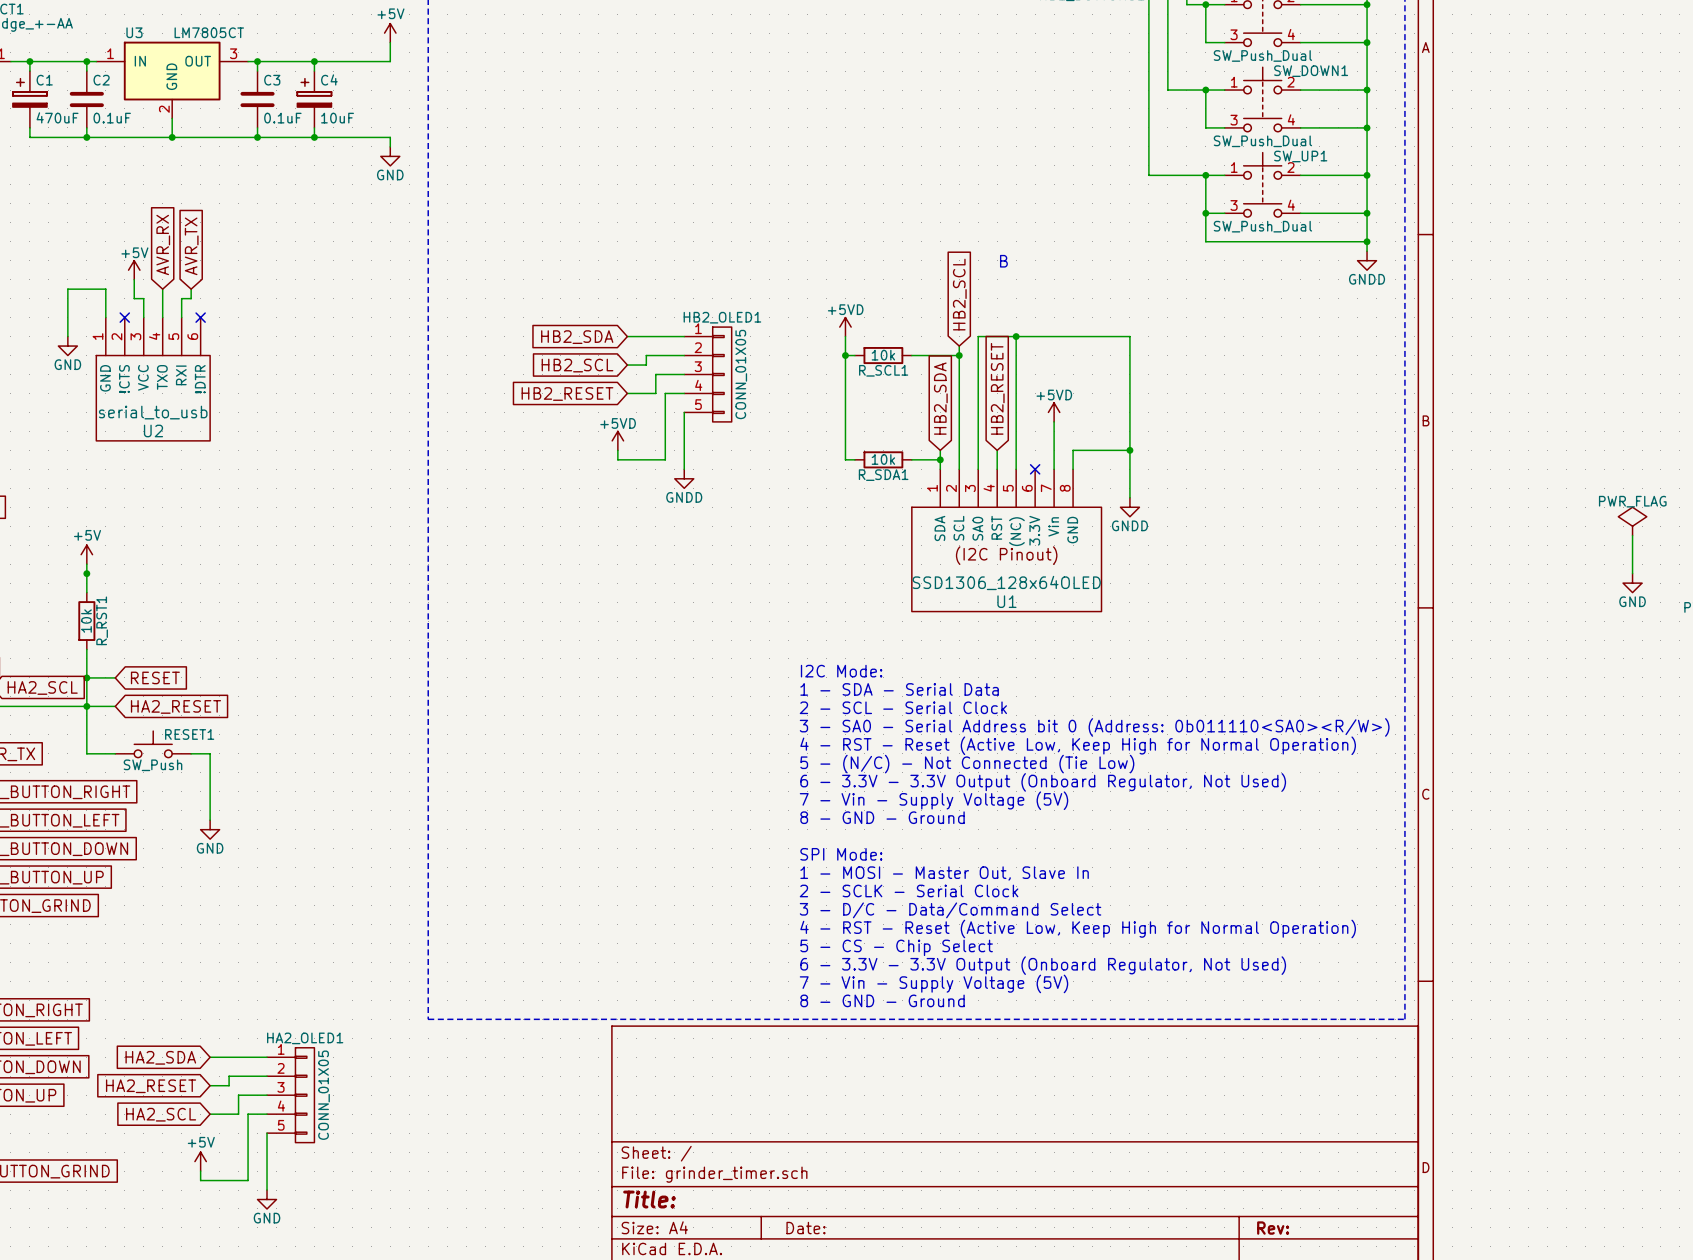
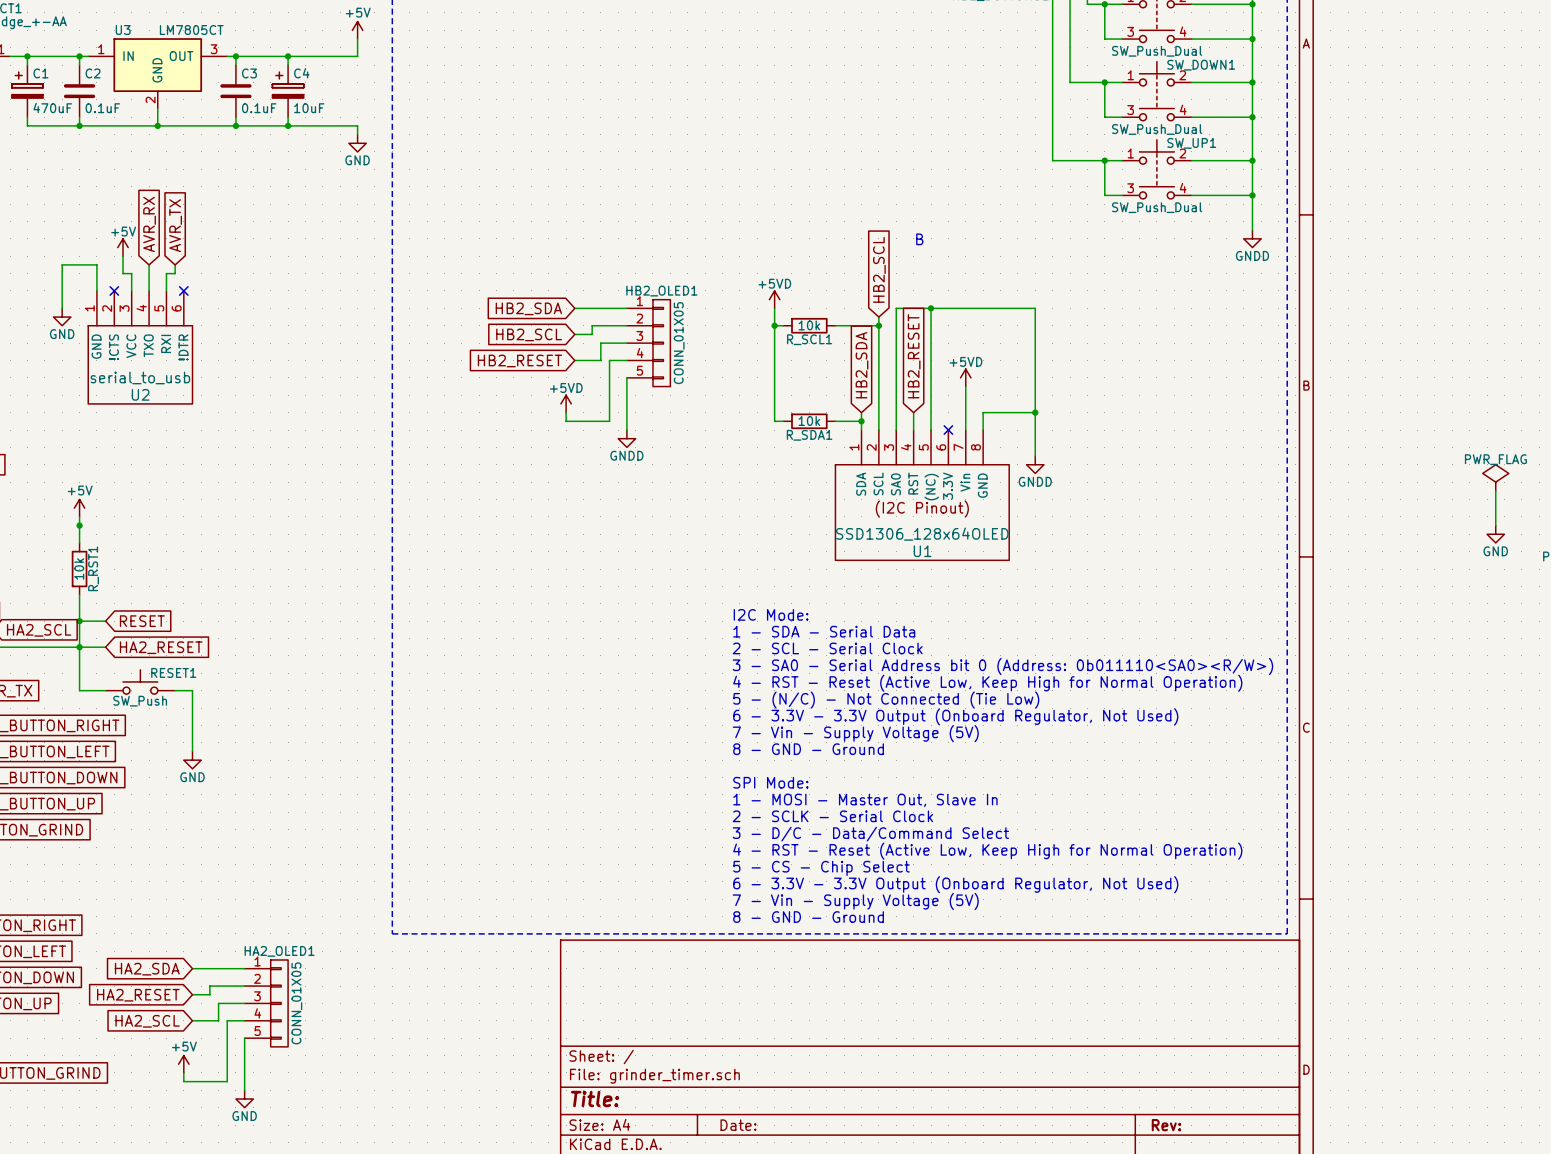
wire: (1205, 213) (1205, 241) (1367, 241) -> none
junction: (1205, 213) -> none
junction: (1367, 241) -> none

